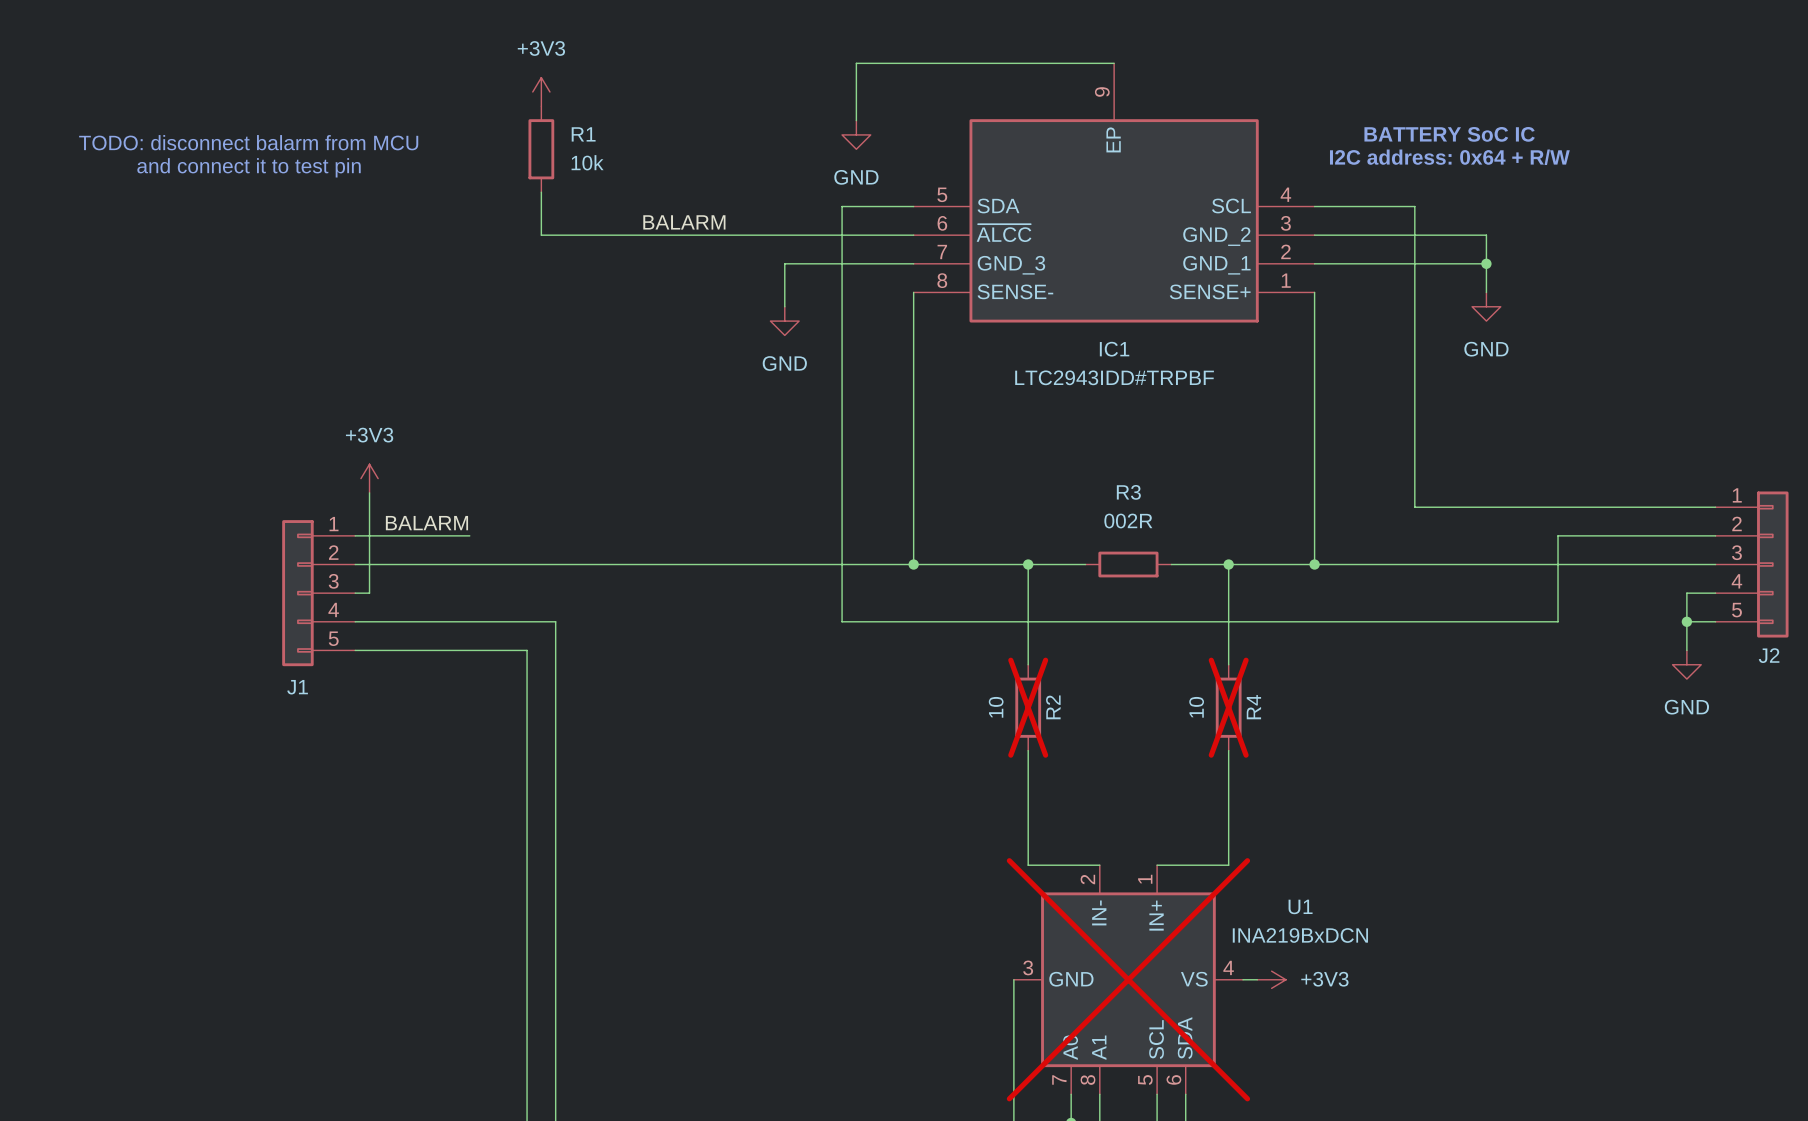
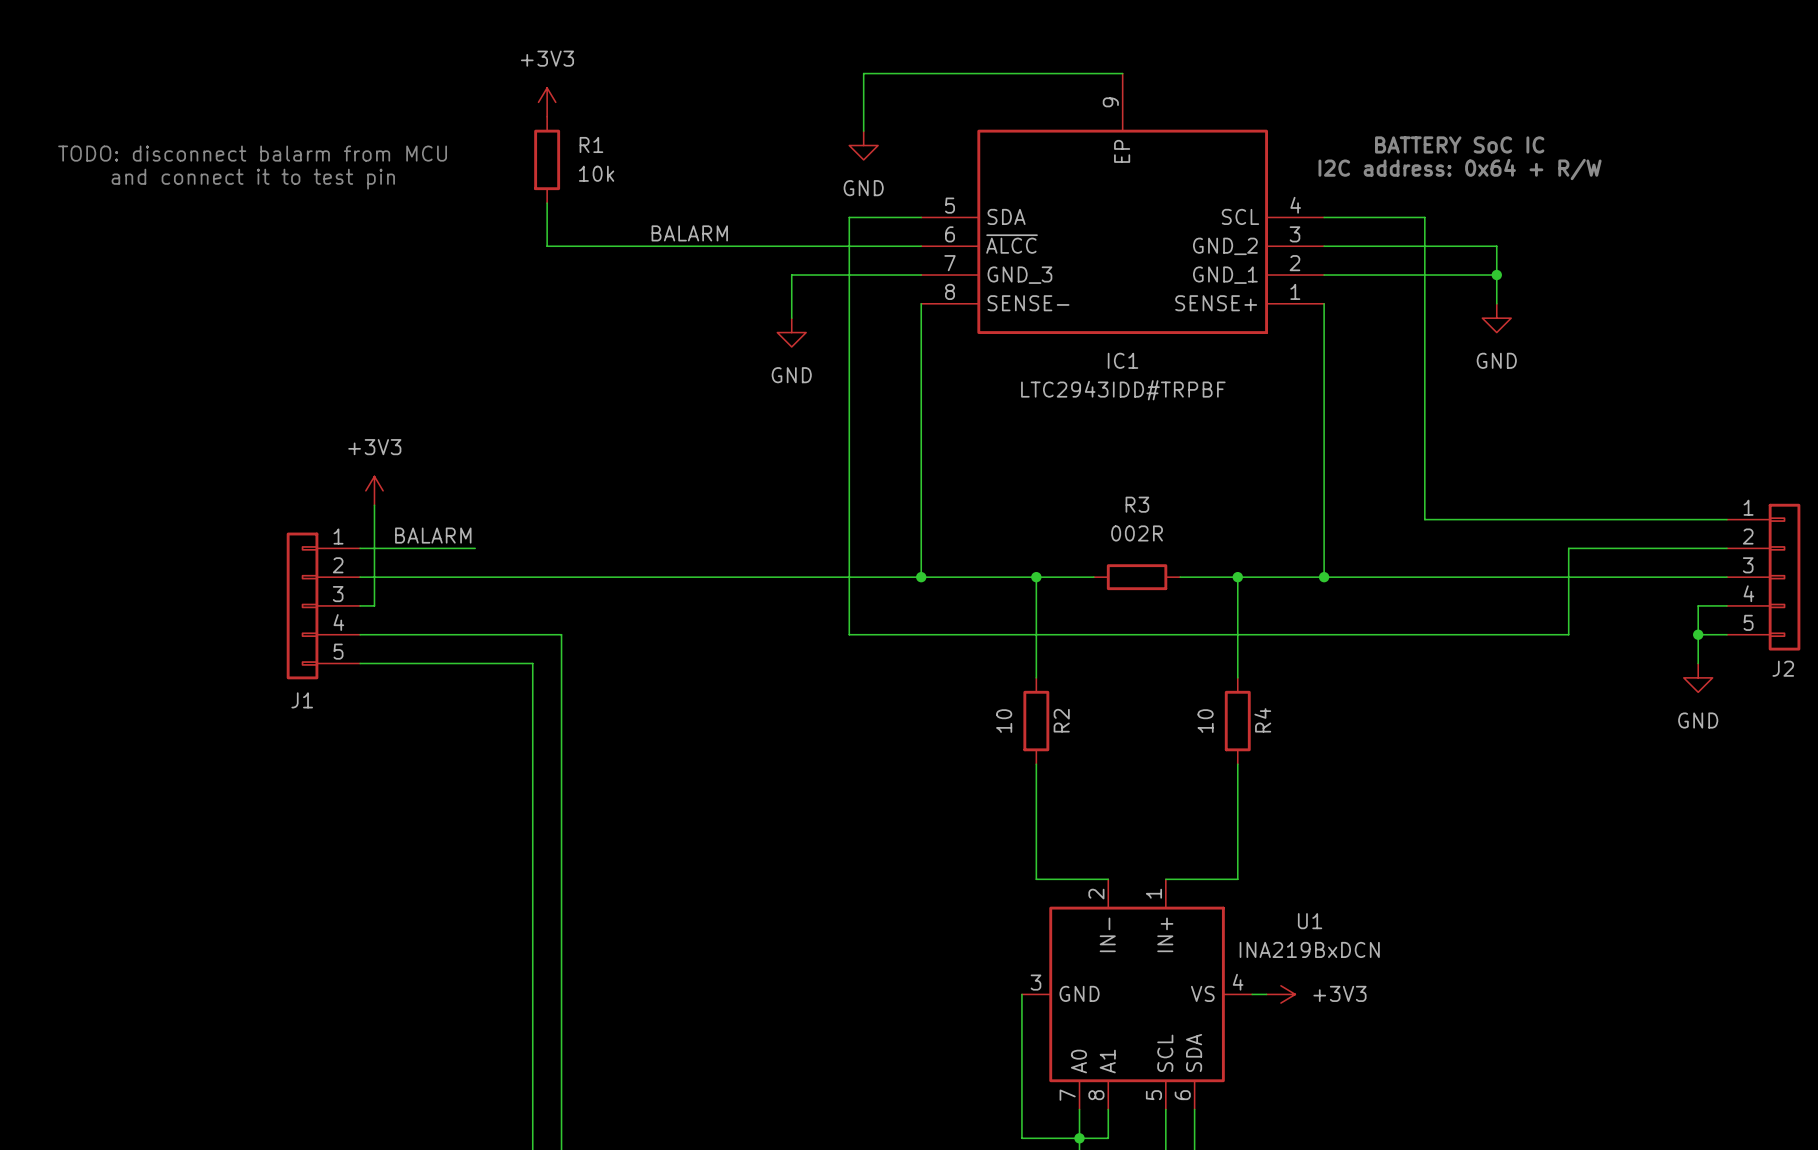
R2 do-not-place cross: (1028, 707) -> none
R4 do-not-place cross: (1228, 707) -> none
U1 do-not-place cross: (1128, 979) -> none

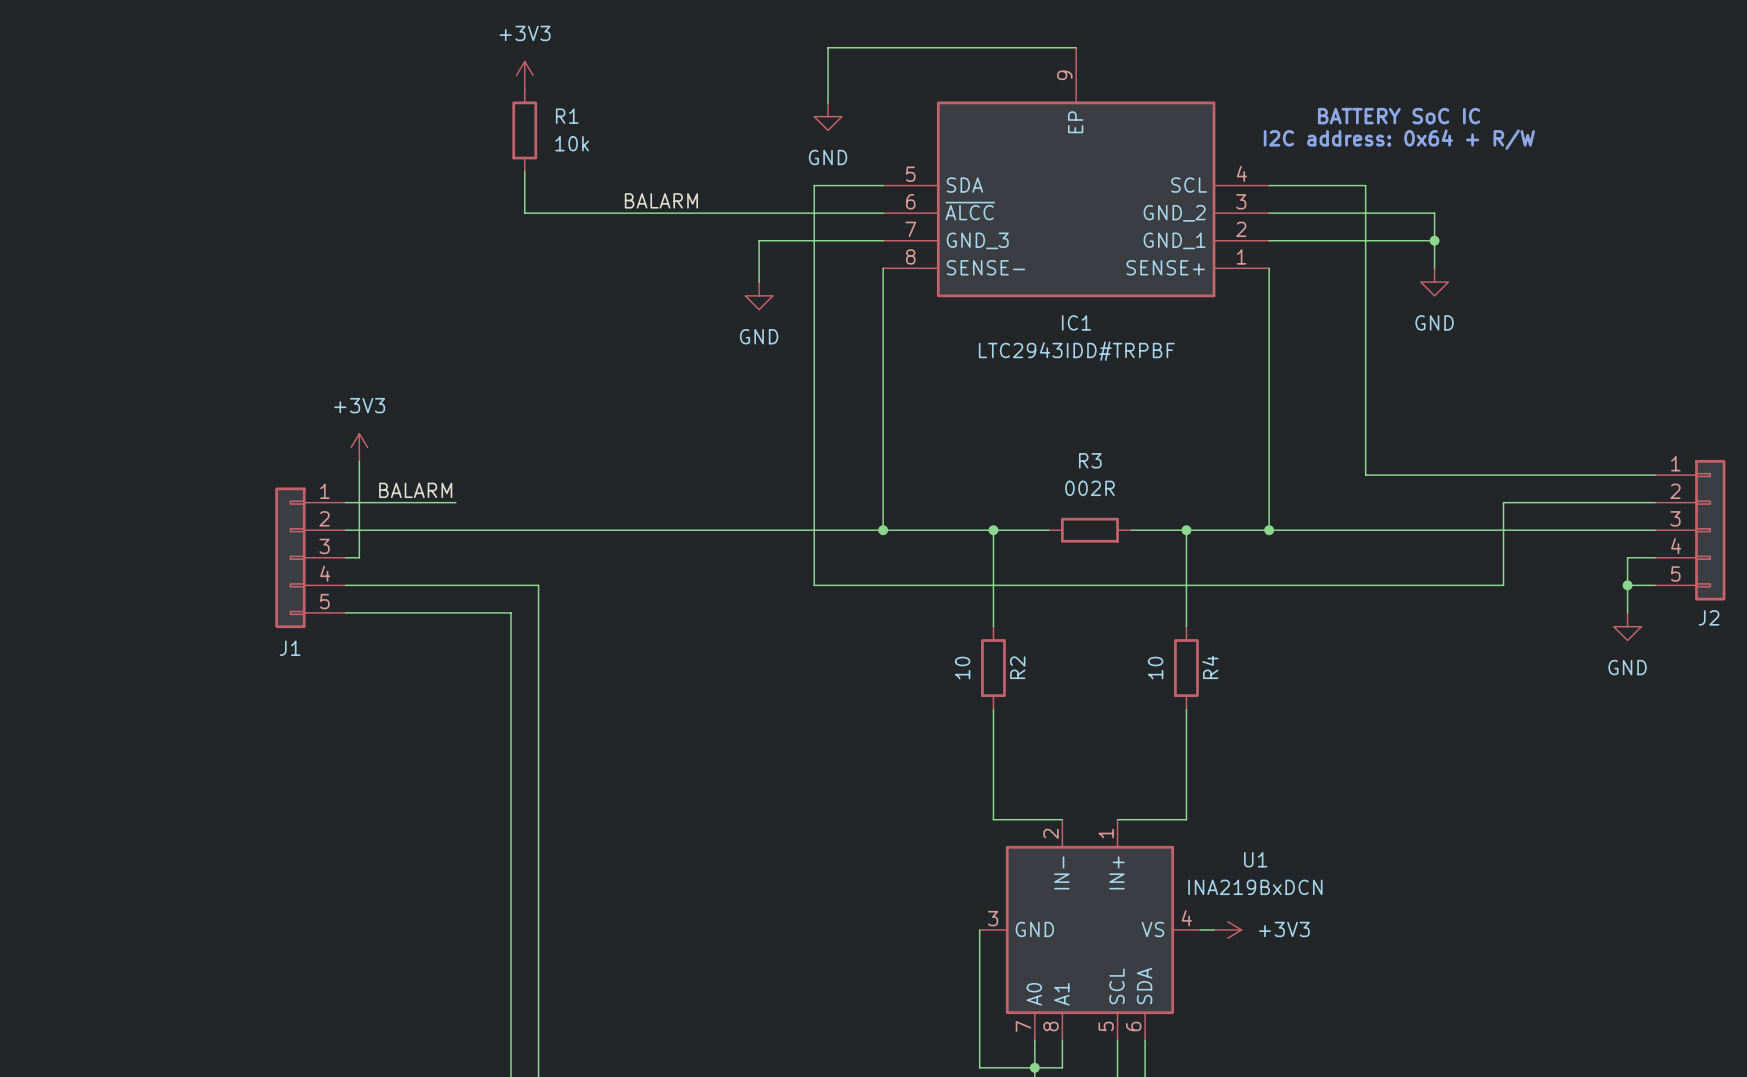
text: TODO: disconnect balarm from MCU (252, 153) -> none
text: and connect it to test pin (253, 179) -> none

